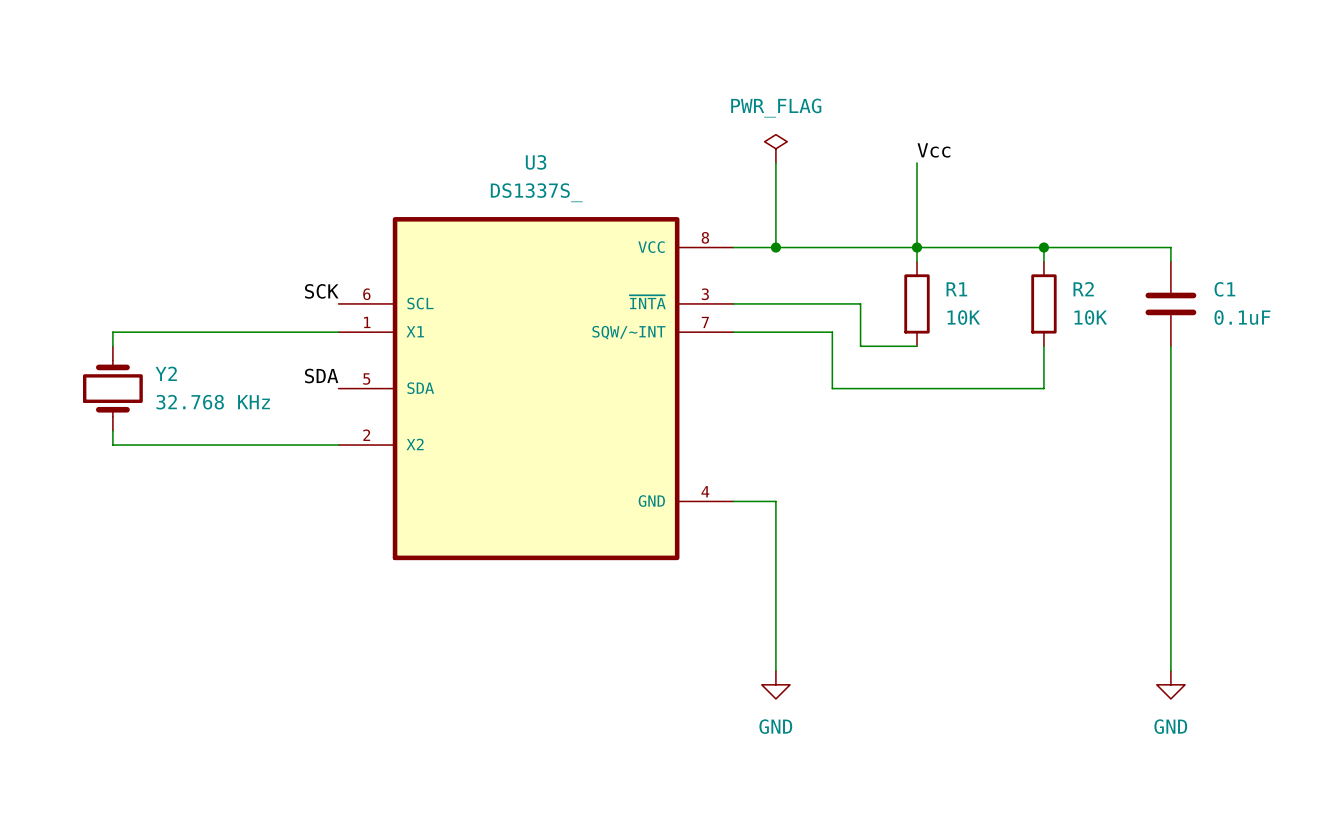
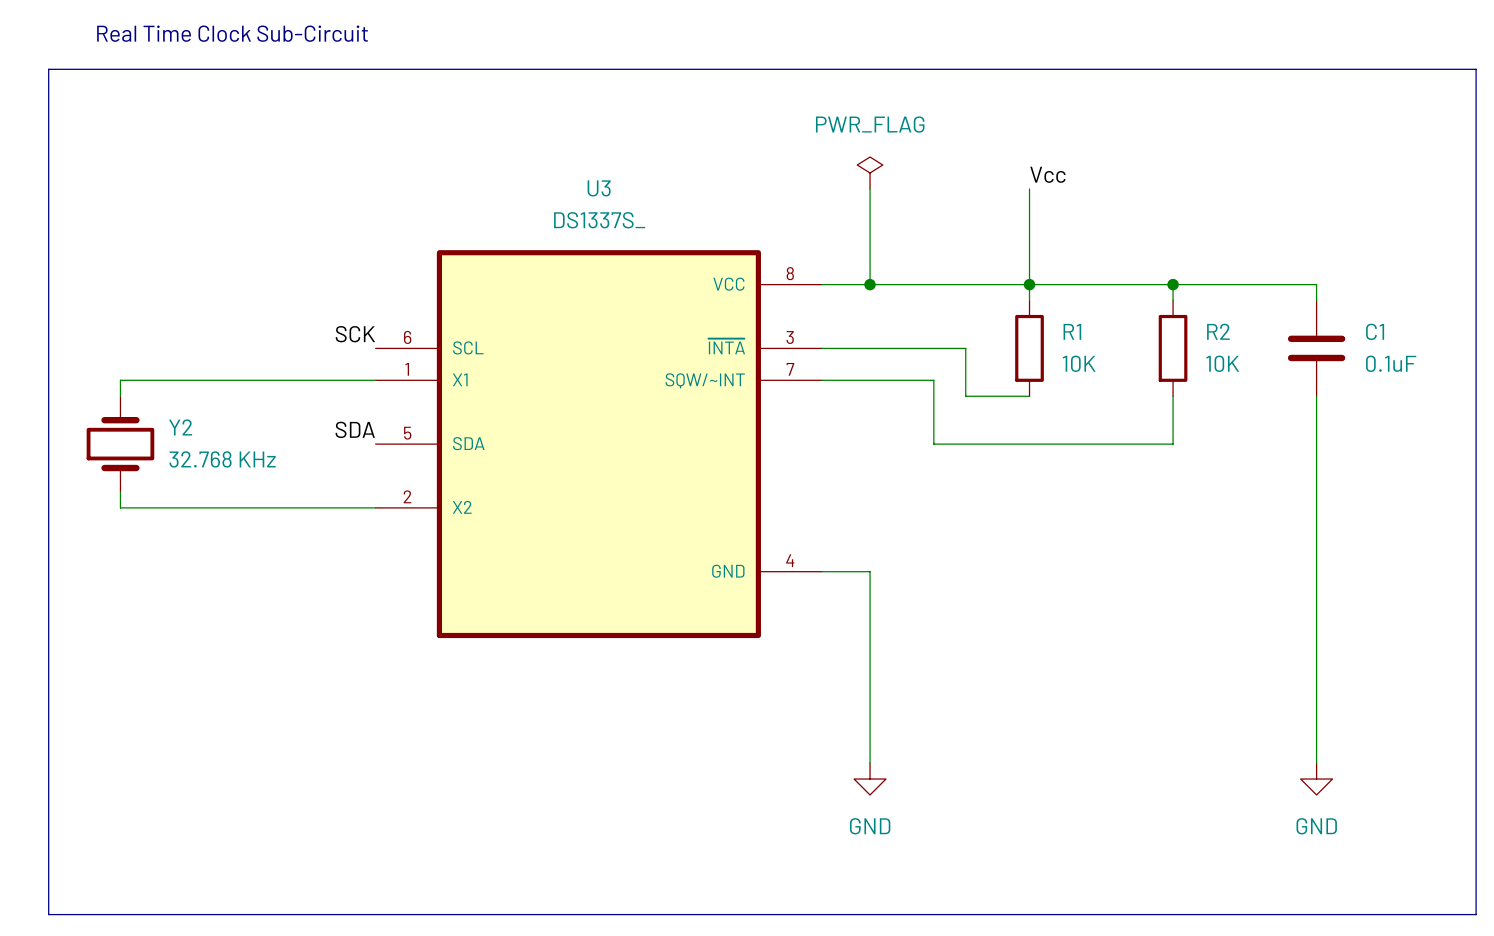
text: none -> Real Time Clock Sub-Circuit (232, 33)
line: none -> (48, 69) (1476, 69) (1476, 914) (48, 914) (48, 69)

